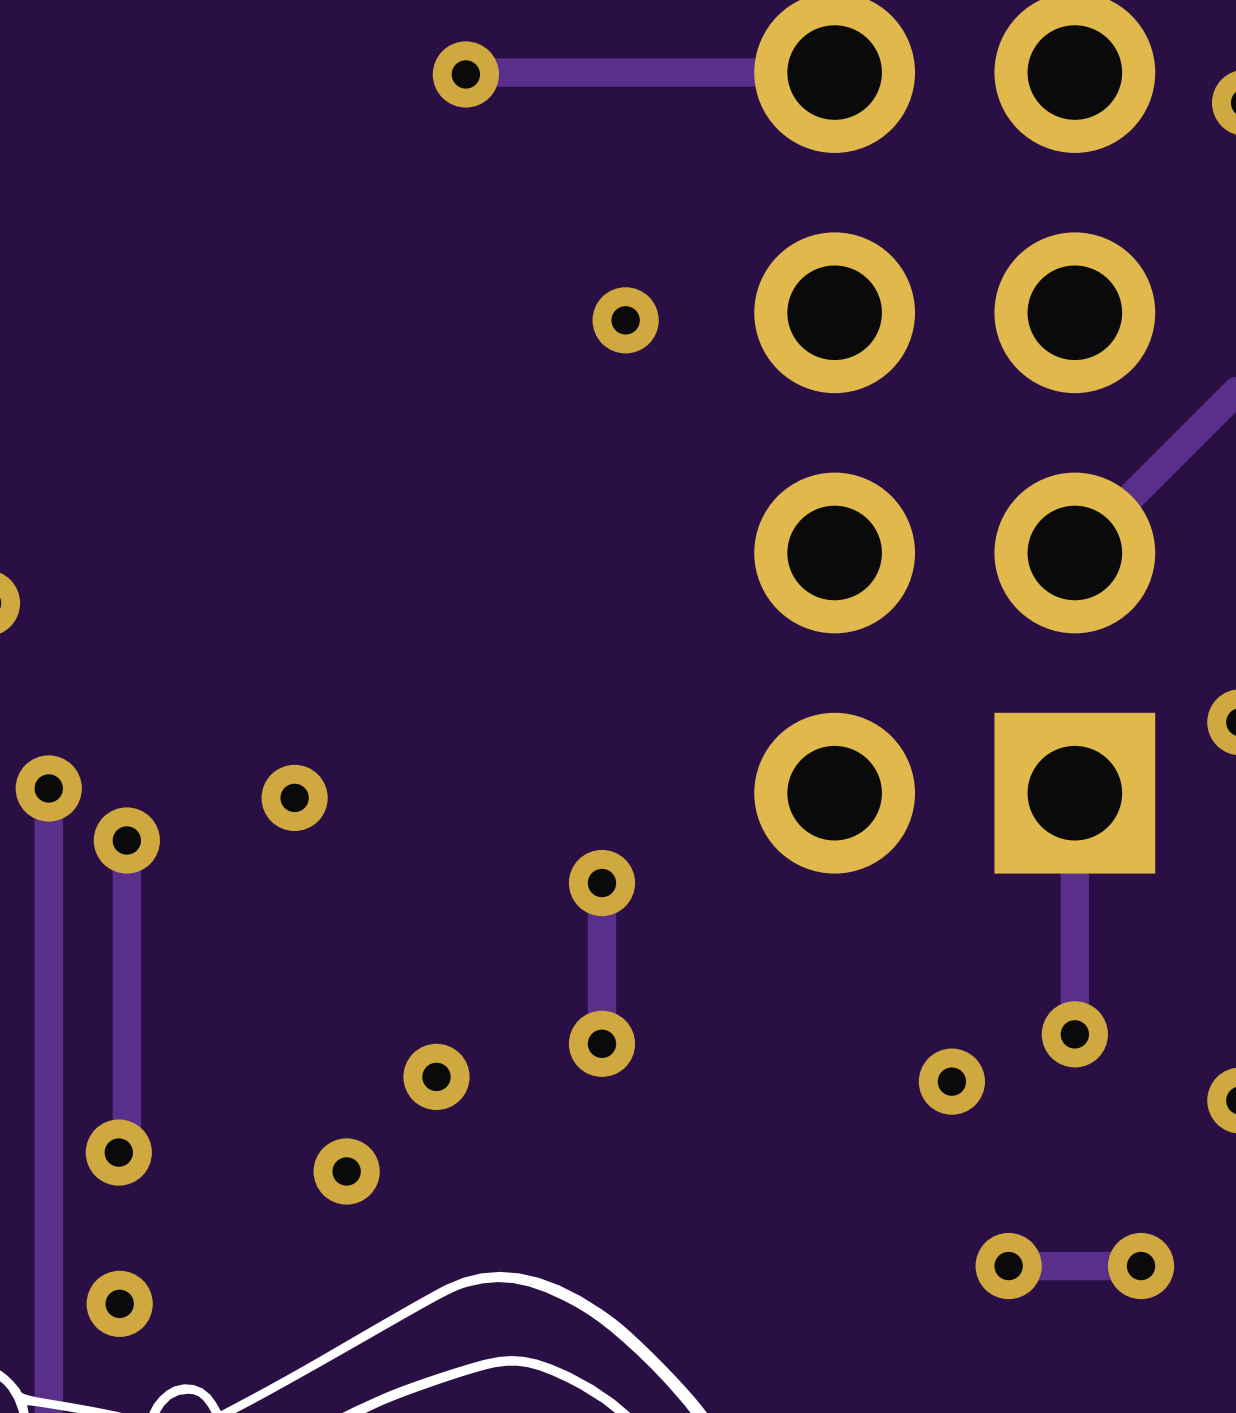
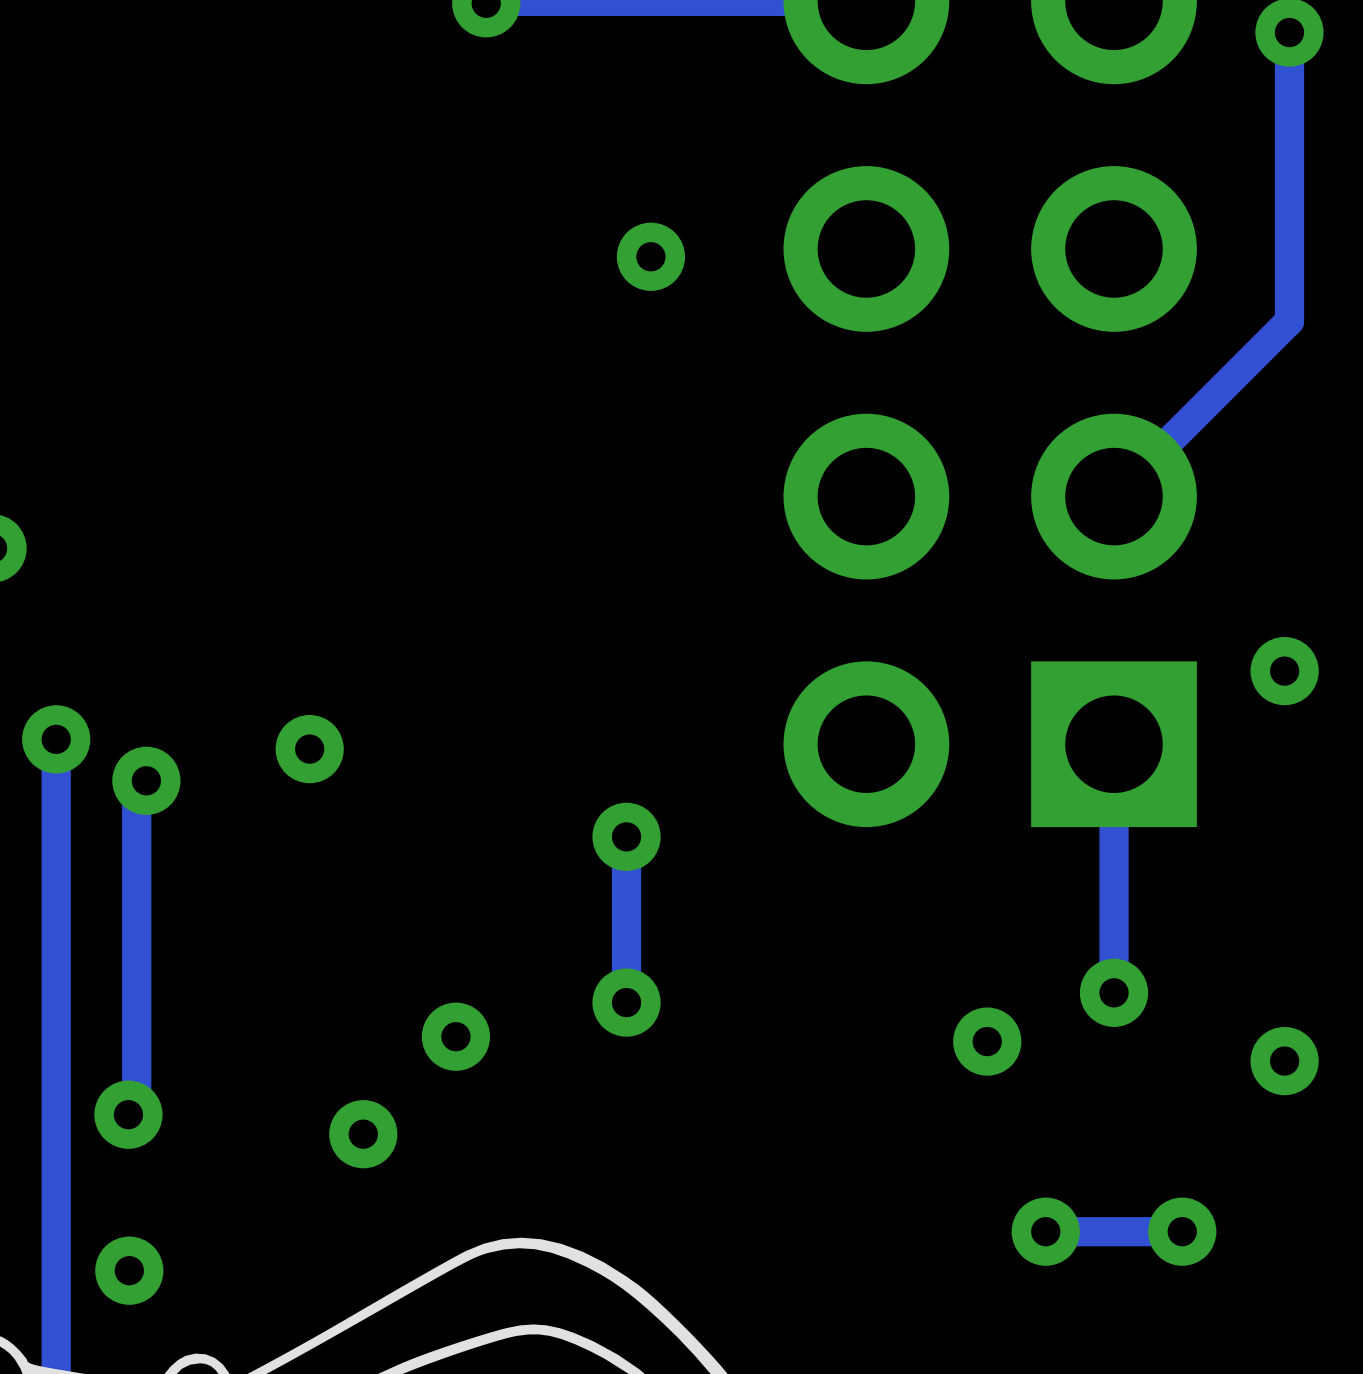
via position: (126, 840) -> (146, 780)

